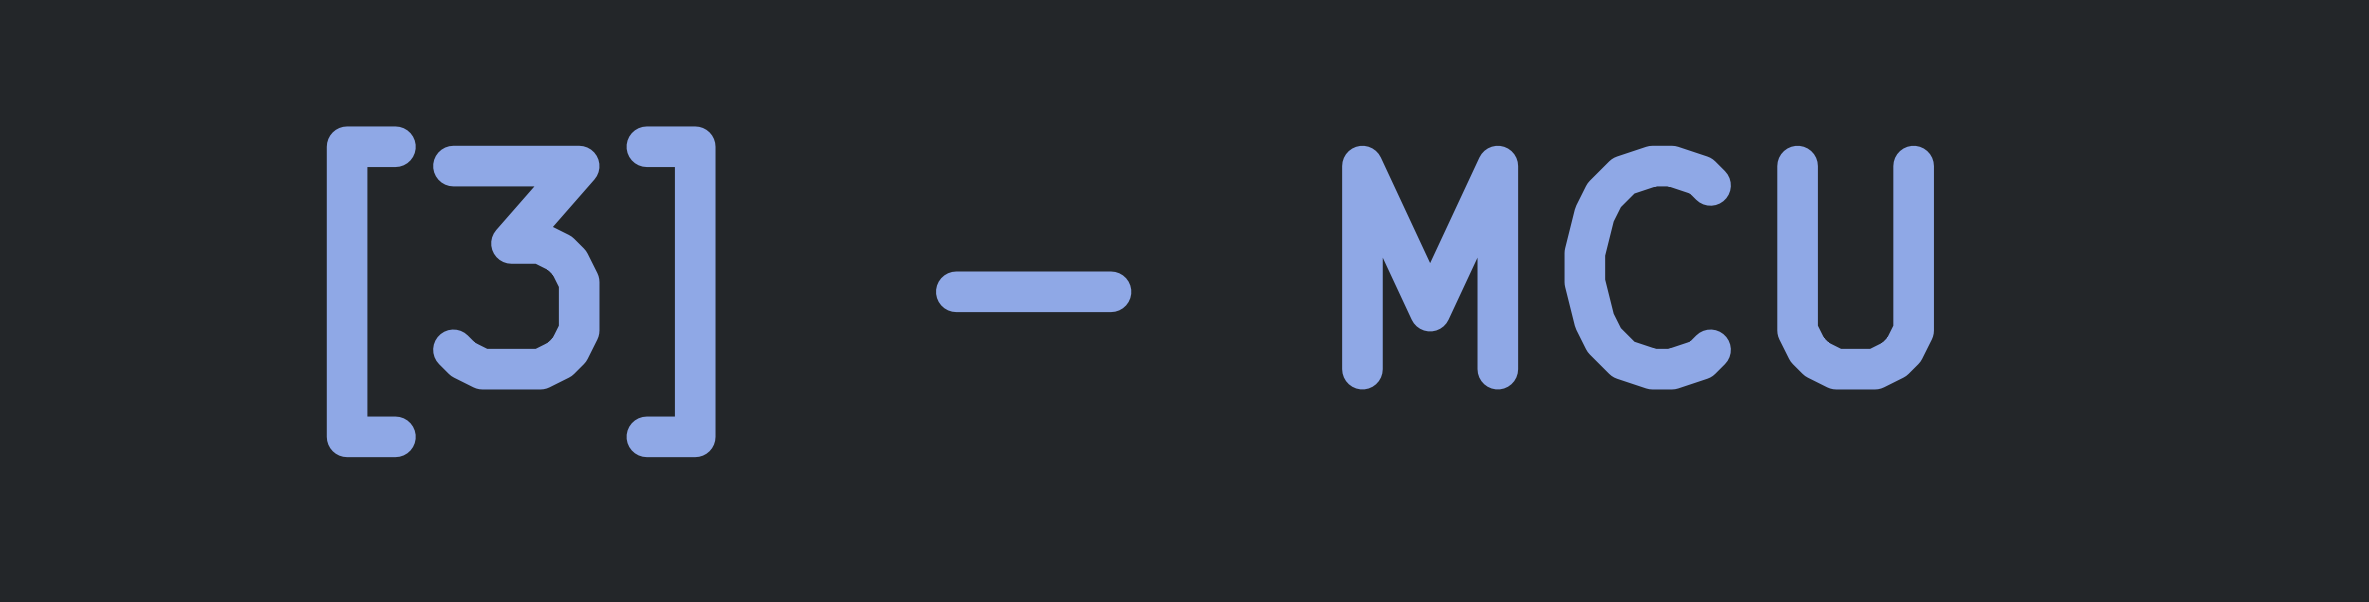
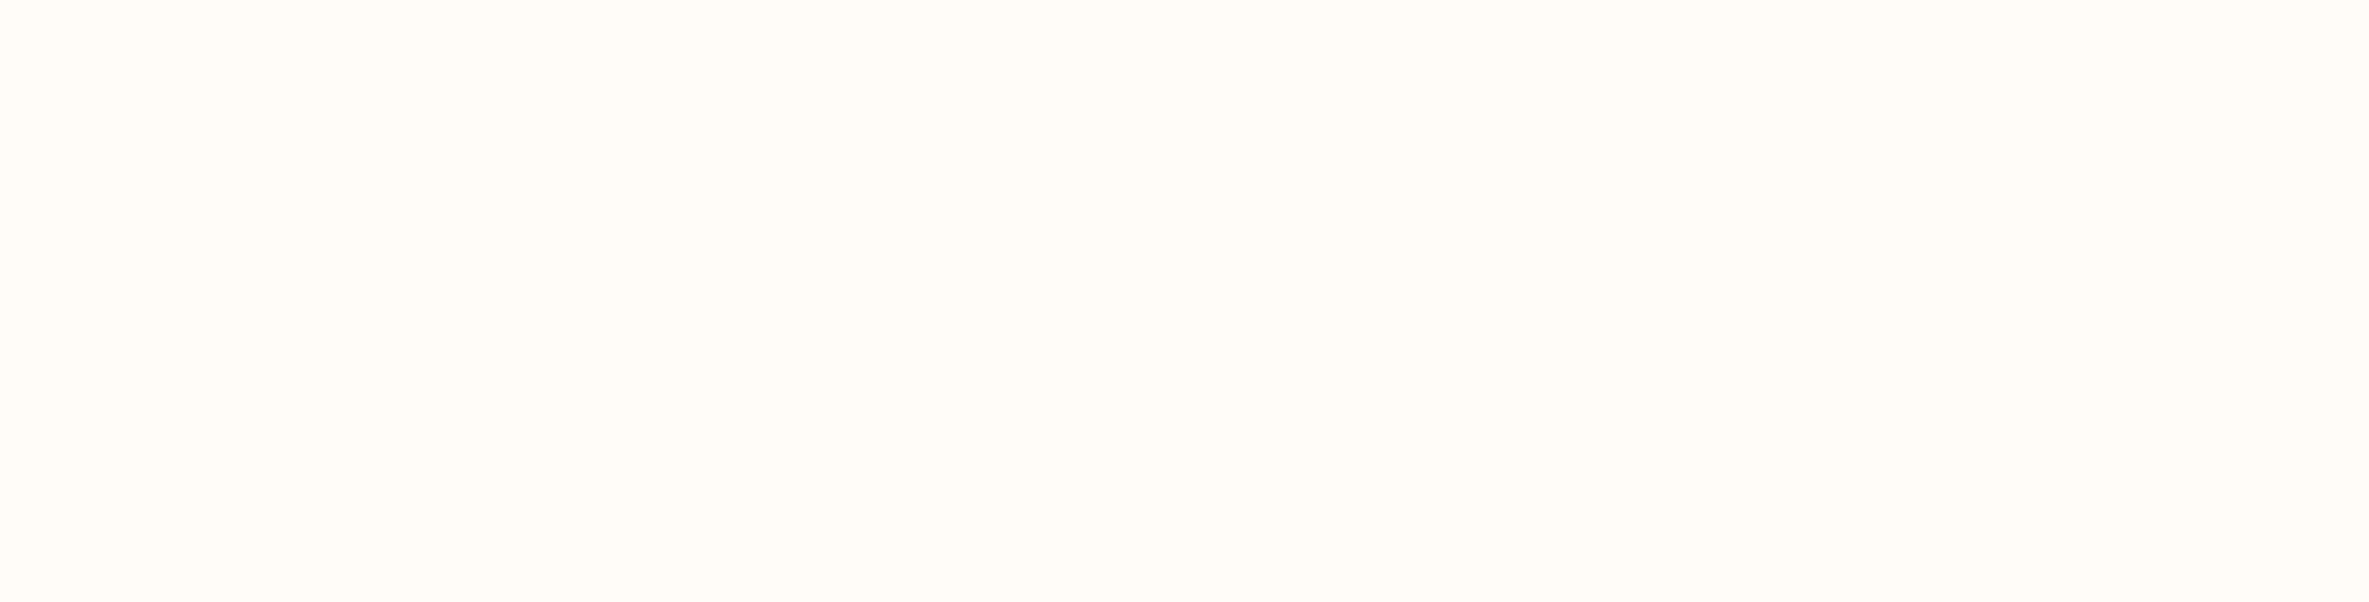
text: [3] - MCU (1130, 291) -> none

